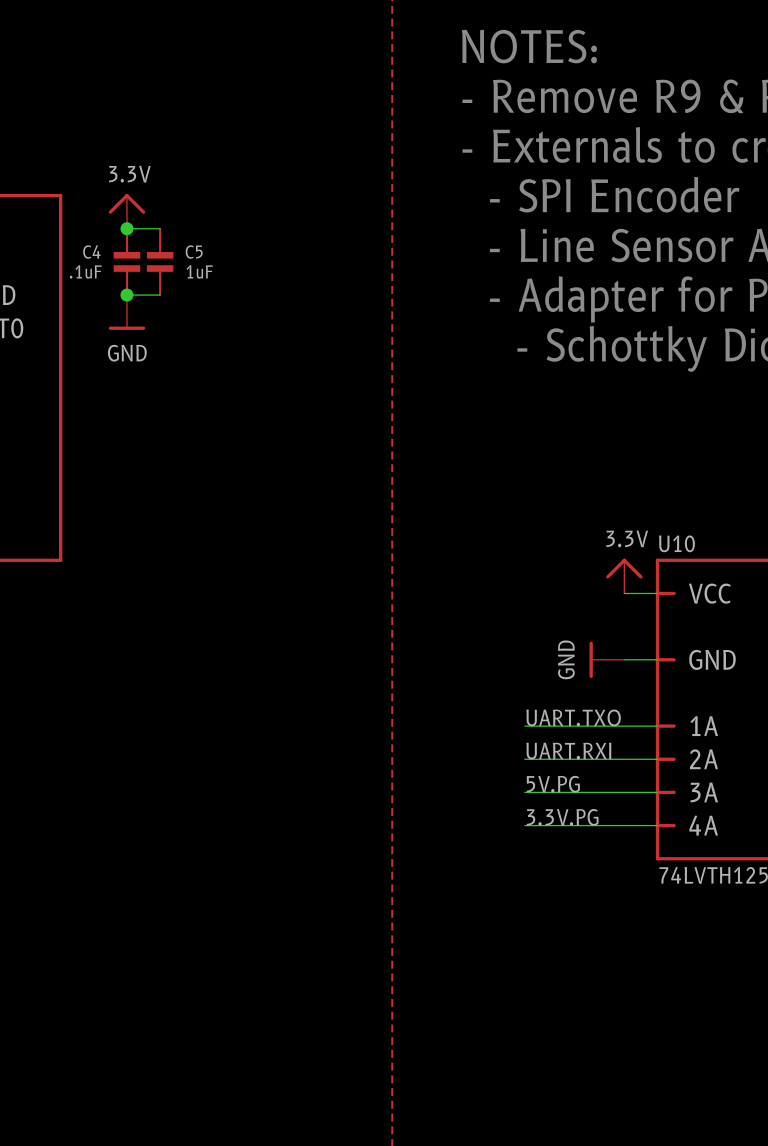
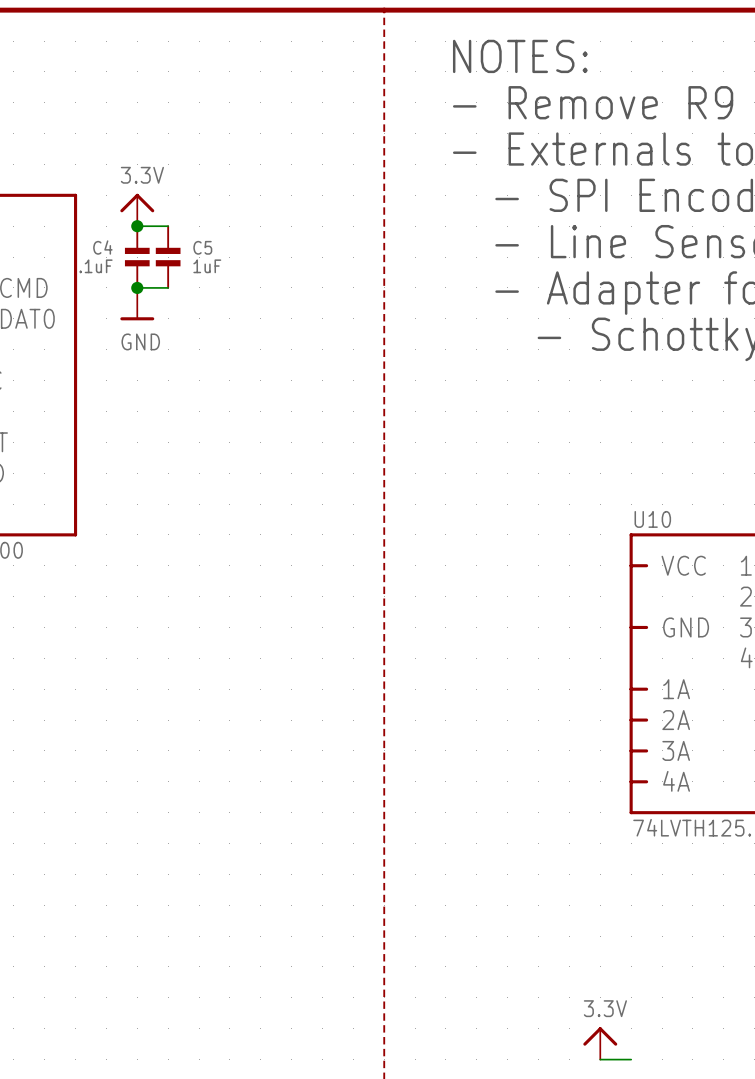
power symbol: 3.3V (624, 576) -> none
wire: (624, 593) (657, 593) -> none
power symbol: GND (606, 659) -> none
wire: (624, 659) (657, 659) -> none
label: UART.TXO (573, 717) -> none
wire: (524, 726) (657, 726) -> none
label: UART.RXI (568, 751) -> none
wire: (524, 759) (657, 759) -> none
label: 5V.PG (553, 784) -> none
wire: (524, 792) (657, 792) -> none
label: 3.3V.PG (562, 817) -> none
wire: (524, 825) (657, 825) -> none
power symbol: none -> 3.3V (600, 1043)
wire: none -> (600, 1059) (631, 1059)

